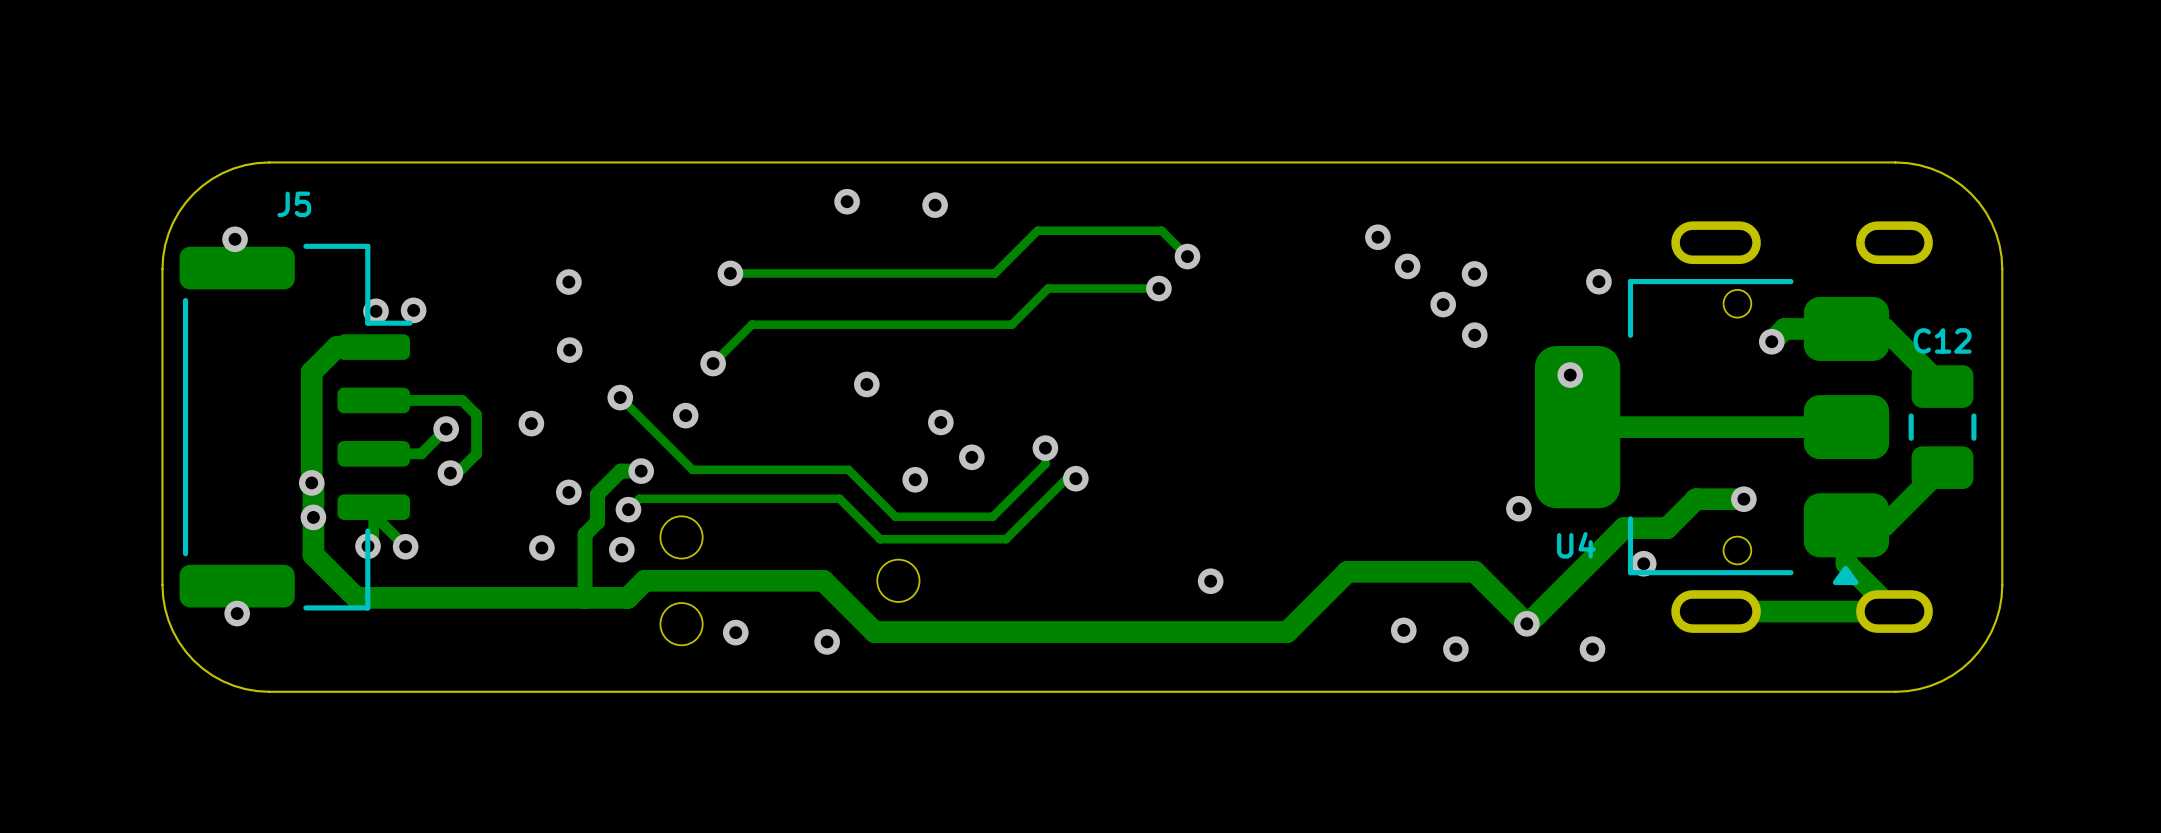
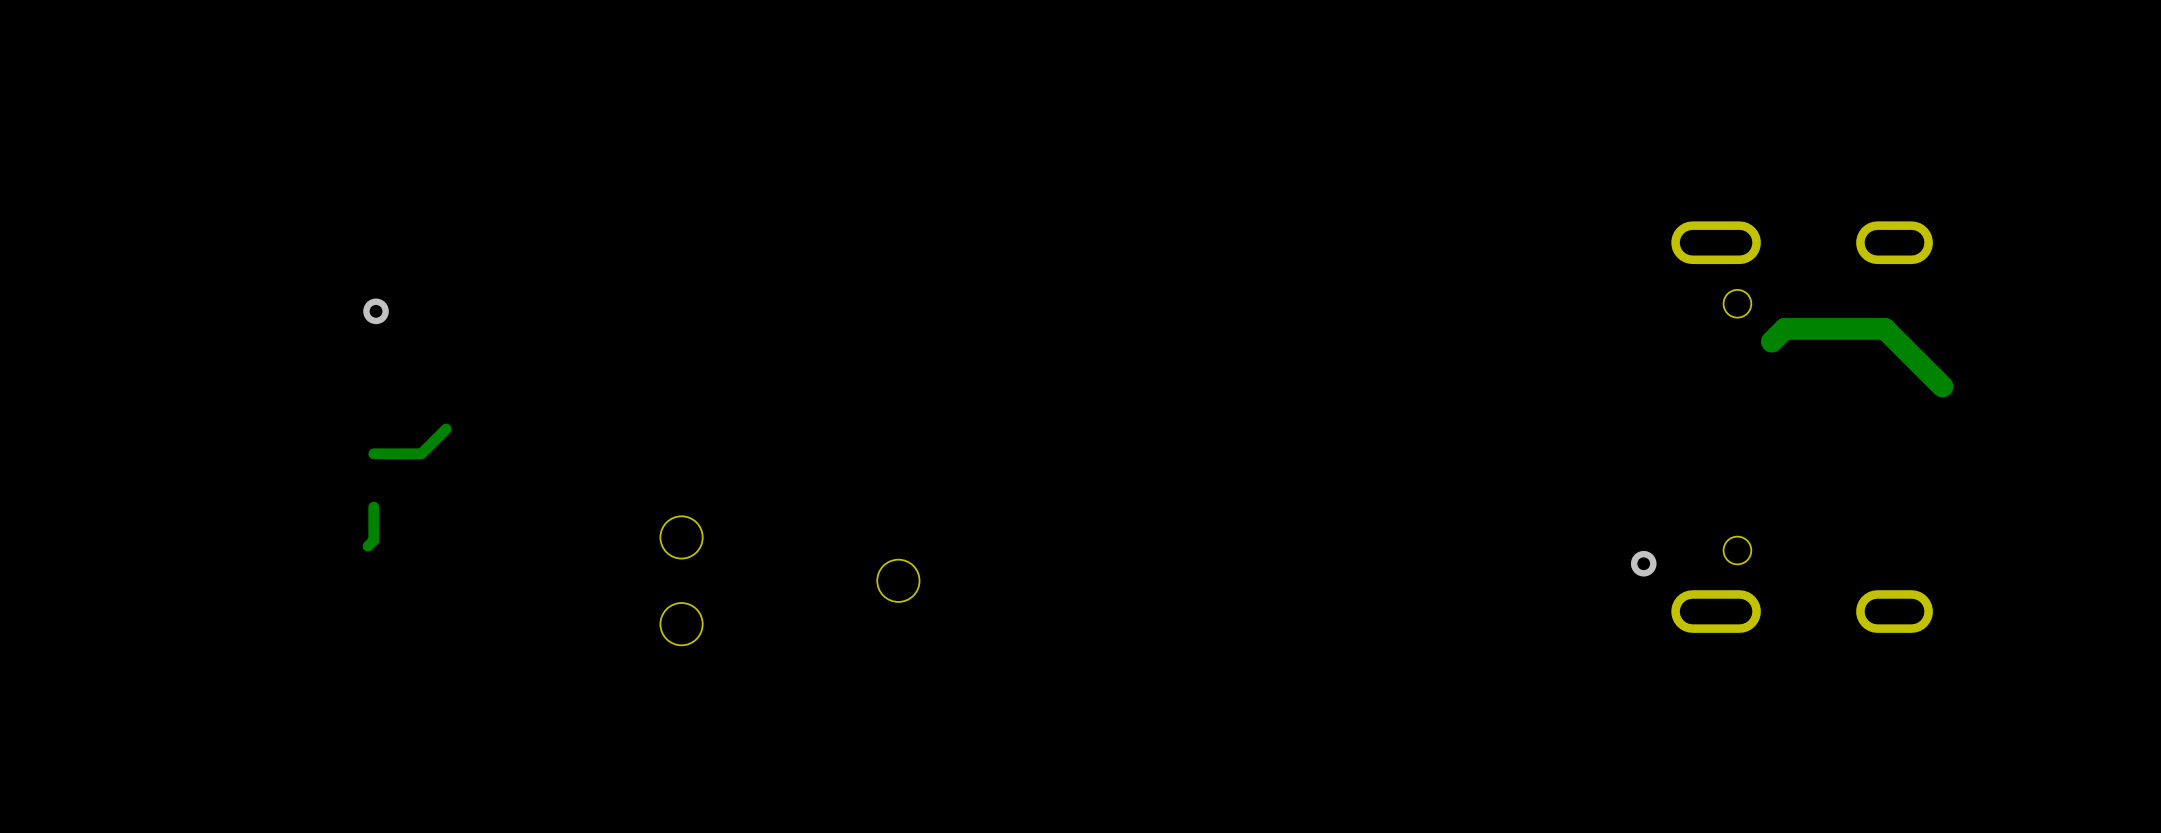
board edge: (1895, 162) (269, 162) (245, 165) (212, 178) (193, 193) (173, 222) (165, 245) (162, 269) (162, 585) (165, 608) (178, 641) (202, 668) (233, 685) (269, 691) (1895, 691) (1919, 689) (1952, 675) (1971, 660) (1985, 641) (1999, 608) (2002, 585) (2002, 269) (1996, 233) (1985, 212) (1971, 193) (1952, 178) (1930, 168) (1895, 162) -> none
via: (847, 201) -> none
via: (935, 205) -> none
via: (1377, 237) -> none
via: (235, 239) -> none
track: (1187, 256) (1161, 230) (1037, 230) (994, 273) (730, 273) -> none
via: (1187, 256) -> none
via: (1407, 266) -> none
via: (730, 273) -> none
via: (1474, 273) -> none
via: (1598, 281) -> none
via: (568, 282) -> none
track: (1158, 288) (1048, 288) (1011, 324) (751, 324) (713, 363) -> none
via: (1158, 288) -> none
via: (1443, 304) -> none
via: (413, 310) -> none
via: (1474, 335) -> none
via: (1771, 341) -> none
track: (373, 347) (336, 347) (311, 372) (313, 554) (356, 597) (627, 597) (644, 580) (823, 580) (874, 632) (1287, 632) (1347, 571) (1474, 571) (1528, 623) (1623, 528) (1667, 528) (1696, 499) (1743, 499) -> none
via: (569, 350) -> none
via: (713, 363) -> none
via: (1570, 375) -> none
via: (866, 384) -> none
track: (620, 397) (692, 469) (848, 469) (895, 516) (992, 516) (1045, 464) (1045, 448) -> none
via: (620, 397) -> none
track: (373, 400) (462, 400) (476, 414) (476, 453) (457, 473) (450, 473) -> none
via: (685, 415) -> none
via: (940, 422) -> none
via: (531, 423) -> none
J5: (296, 427) -> none
track: (1846, 427) (1577, 427) -> none
C12: (1942, 427) -> none
via: (446, 429) -> none
U4: (1712, 432) -> none
via: (1045, 448) -> none
via: (971, 457) -> none
track: (1942, 467) (1884, 525) (1846, 525) (1846, 563) (1894, 611) (1716, 611) -> none
track: (641, 471) (620, 471) (597, 494) (597, 521) (585, 534) (585, 597) -> none
via: (641, 471) -> none
via: (450, 473) -> none
track: (1075, 478) (1066, 478) (1006, 539) (880, 539) (839, 498) (639, 498) (628, 509) -> none
via: (1075, 478) -> none
via: (915, 479) -> none
via: (311, 482) -> none
via: (568, 492) -> none
via: (1743, 499) -> none
via: (1518, 508) -> none
via: (628, 509) -> none
track: (373, 514) (405, 546) -> none
via: (313, 517) -> none
via: (368, 546) -> none
via: (405, 546) -> none
via: (541, 547) -> none
via: (621, 549) -> none
via: (1210, 581) -> none
via: (237, 613) -> none
via: (1526, 623) -> none
via: (1403, 630) -> none
via: (735, 632) -> none
via: (827, 641) -> none
via: (1455, 649) -> none
via: (1592, 649) -> none

